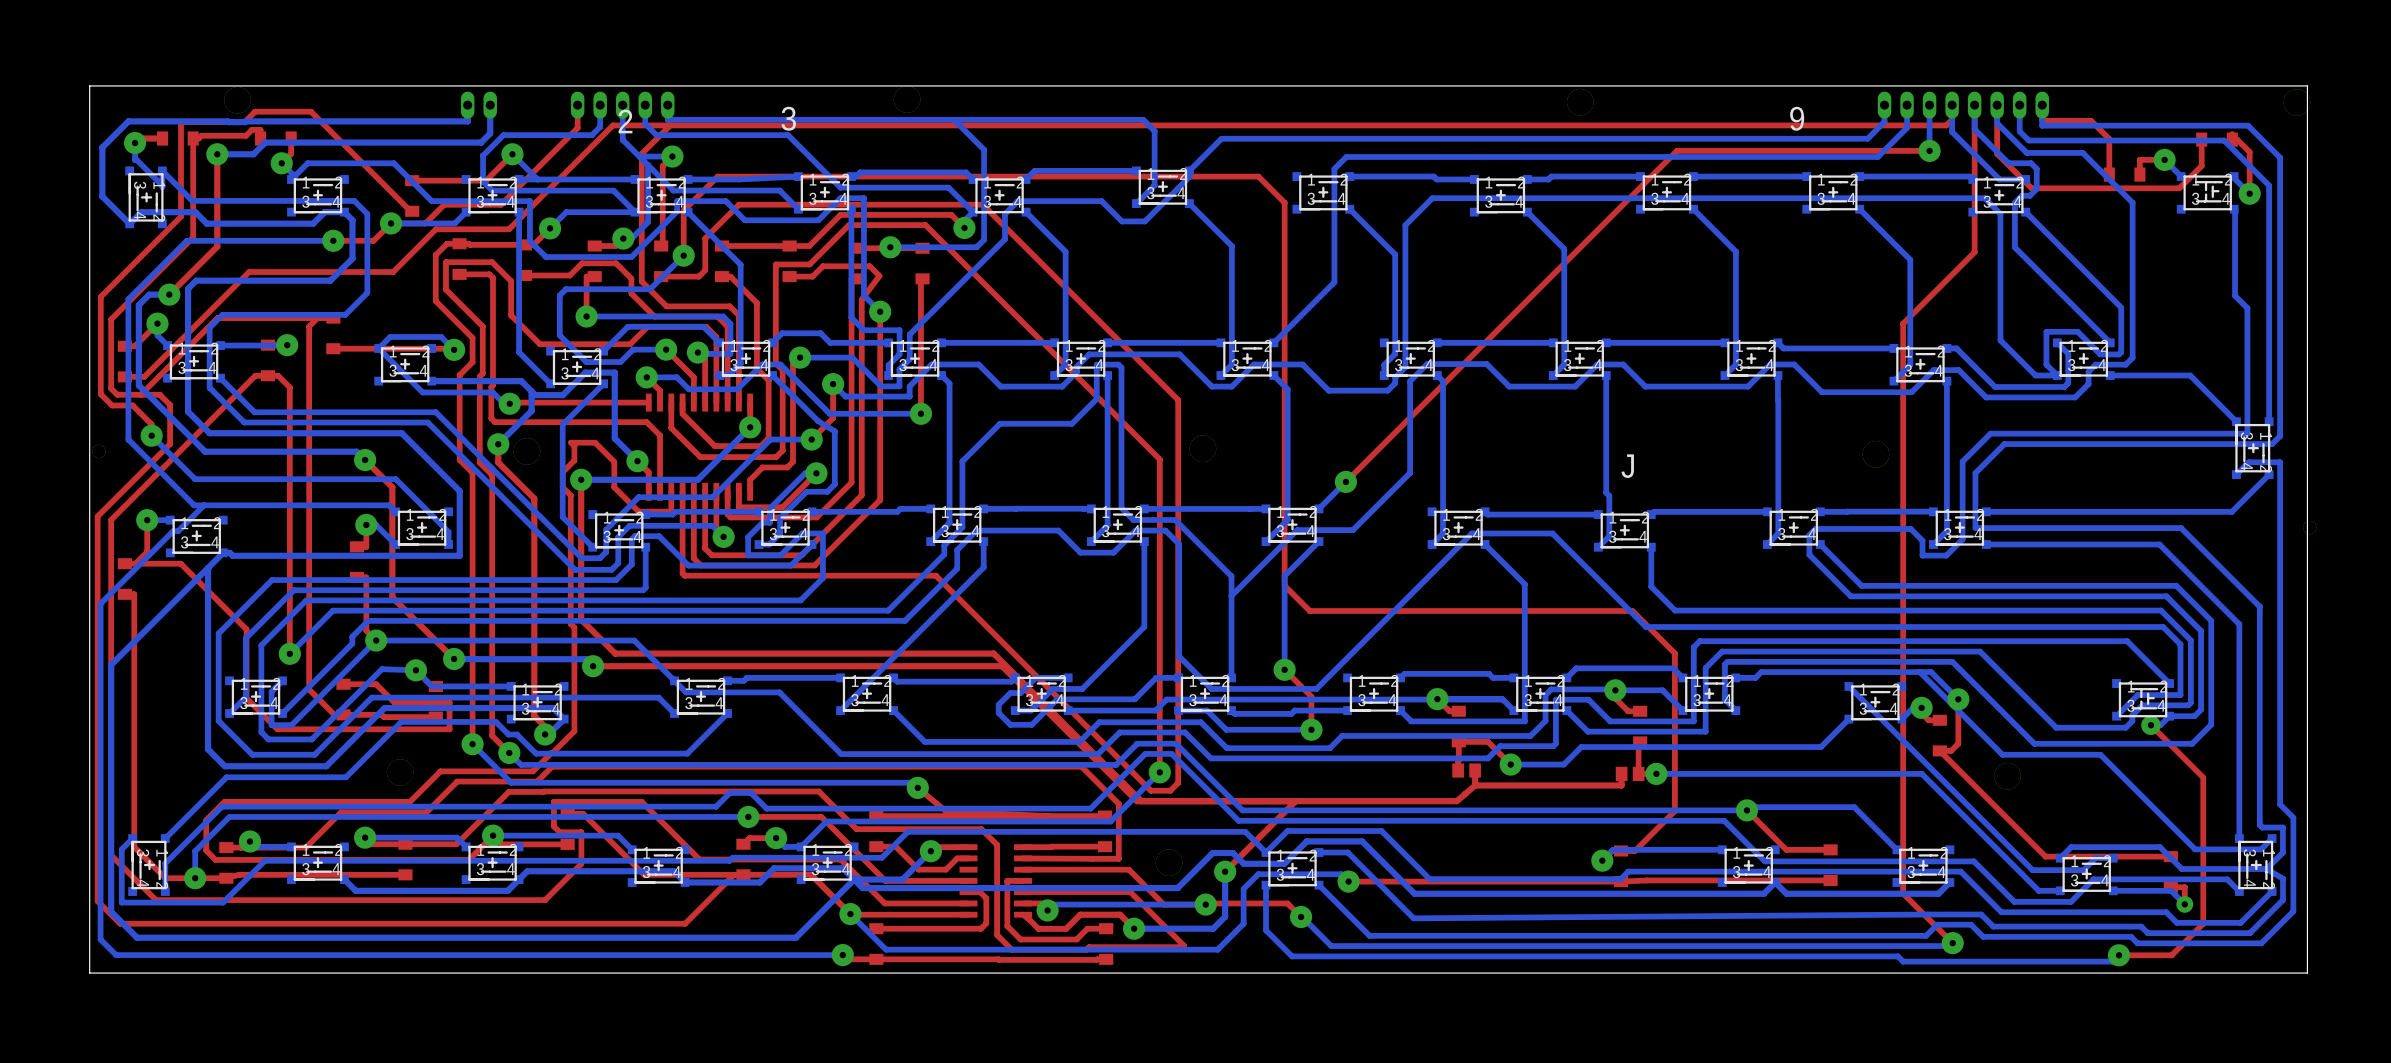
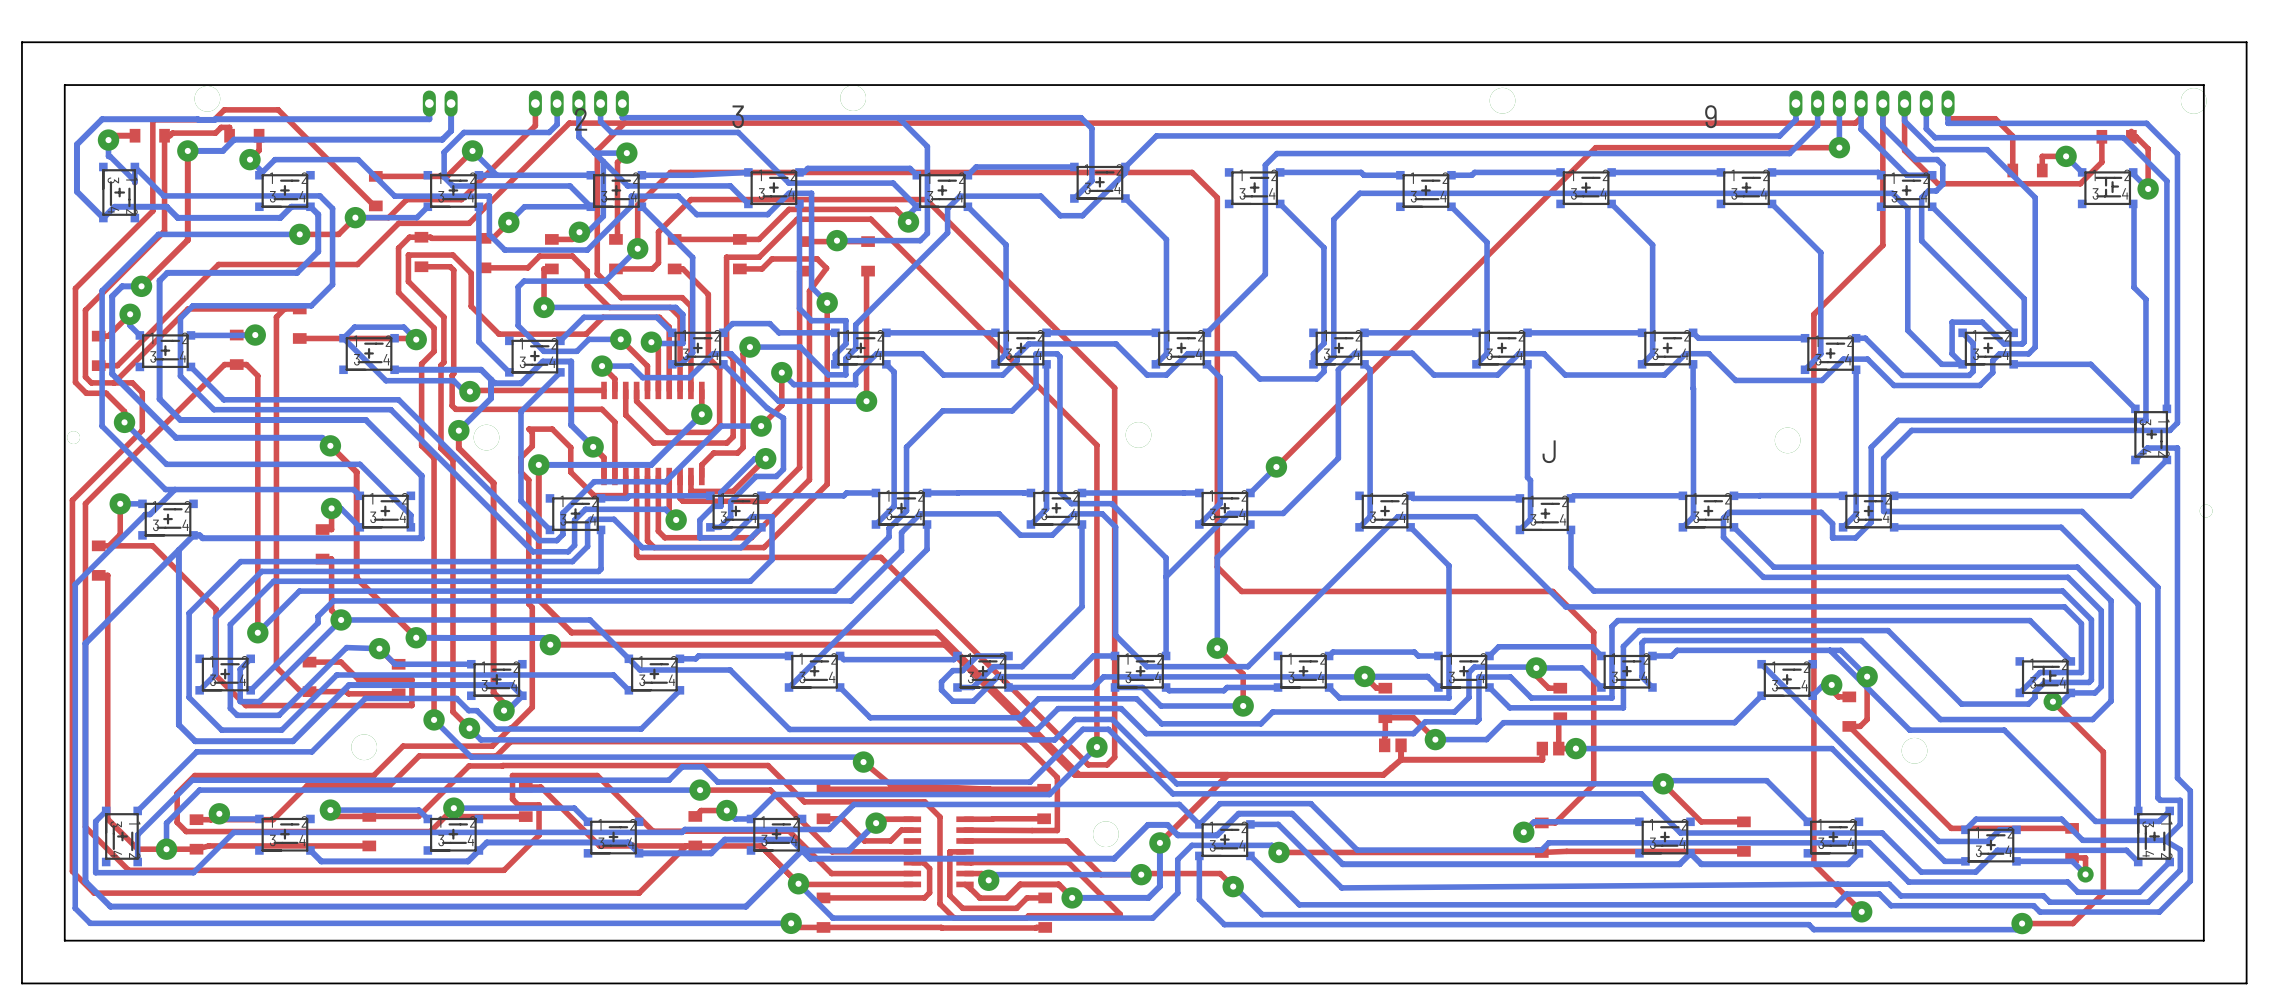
board edge: none -> (2246, 42) (21, 42) (21, 983) (2246, 983) (2246, 42)

